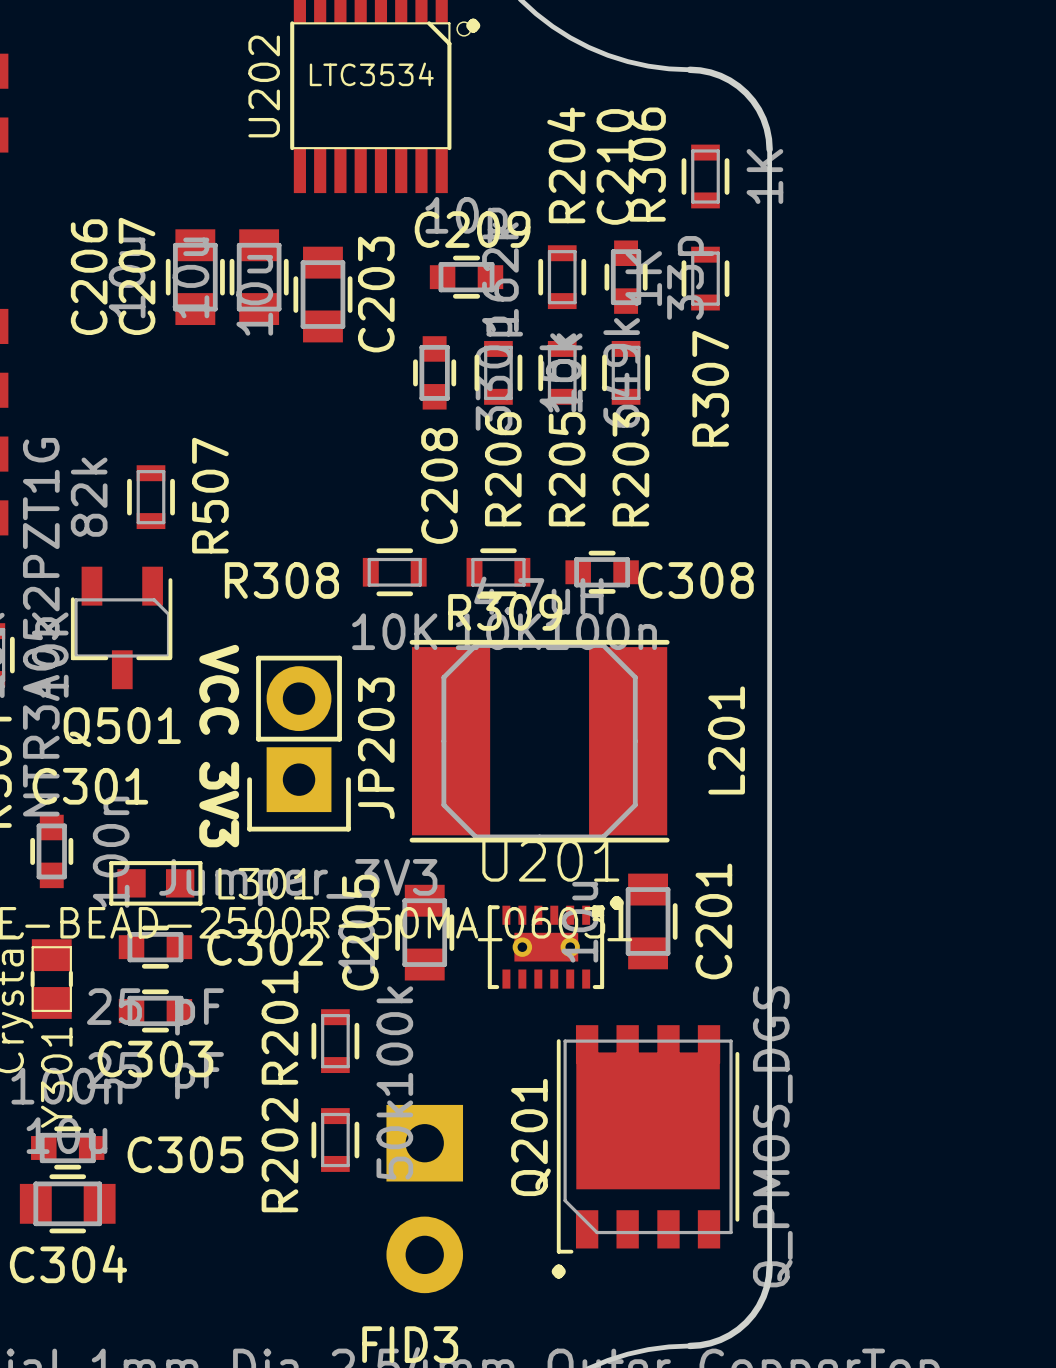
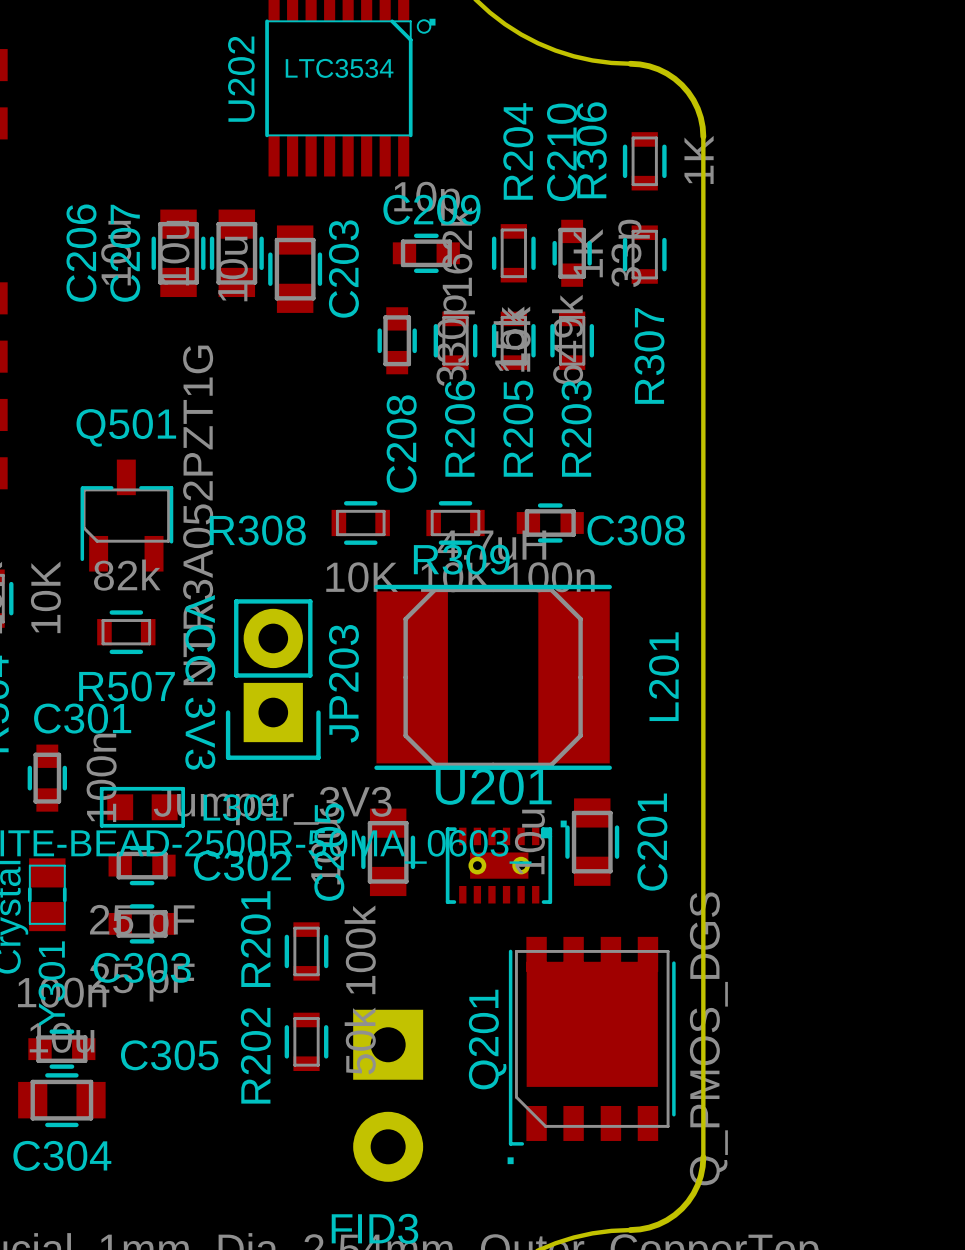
R507 rotation: 0° (150, 497) -> 90° clockwise (126, 632)
R507 position: (150, 497) -> (126, 632)
Q501 rotation: 0° (121, 627) -> 180° (126, 515)

